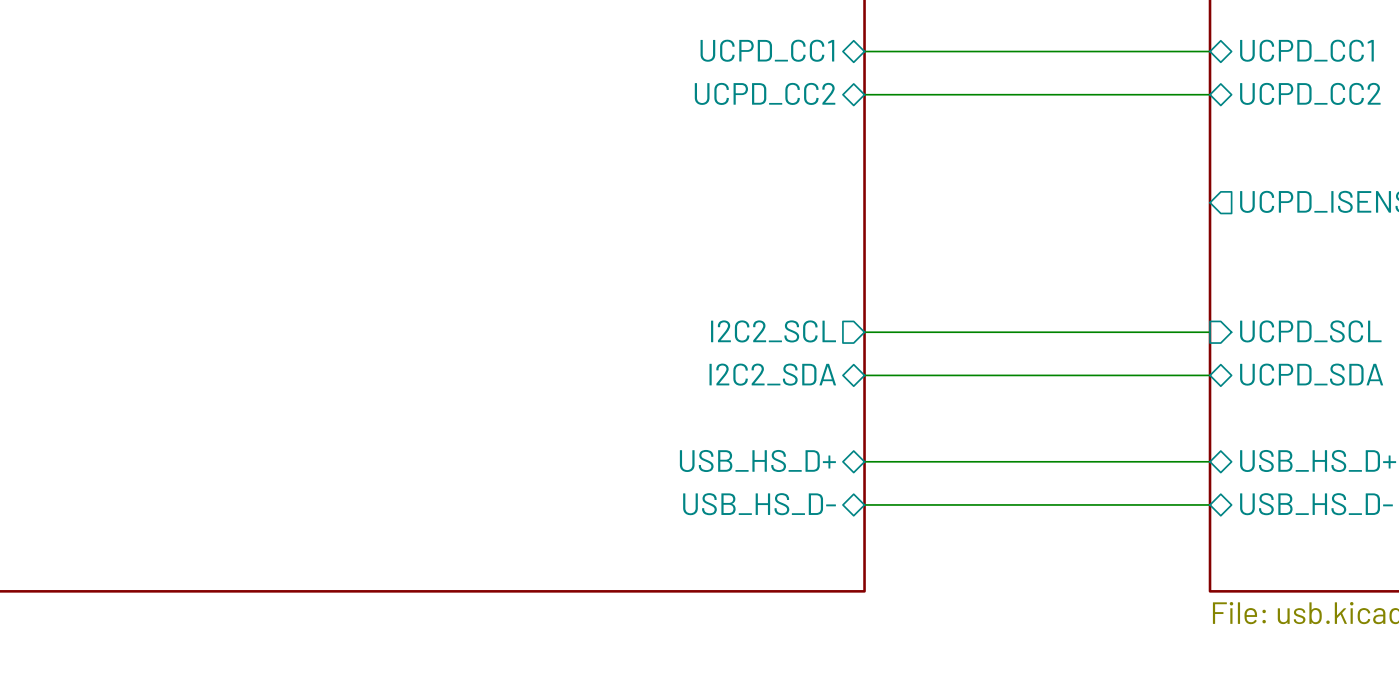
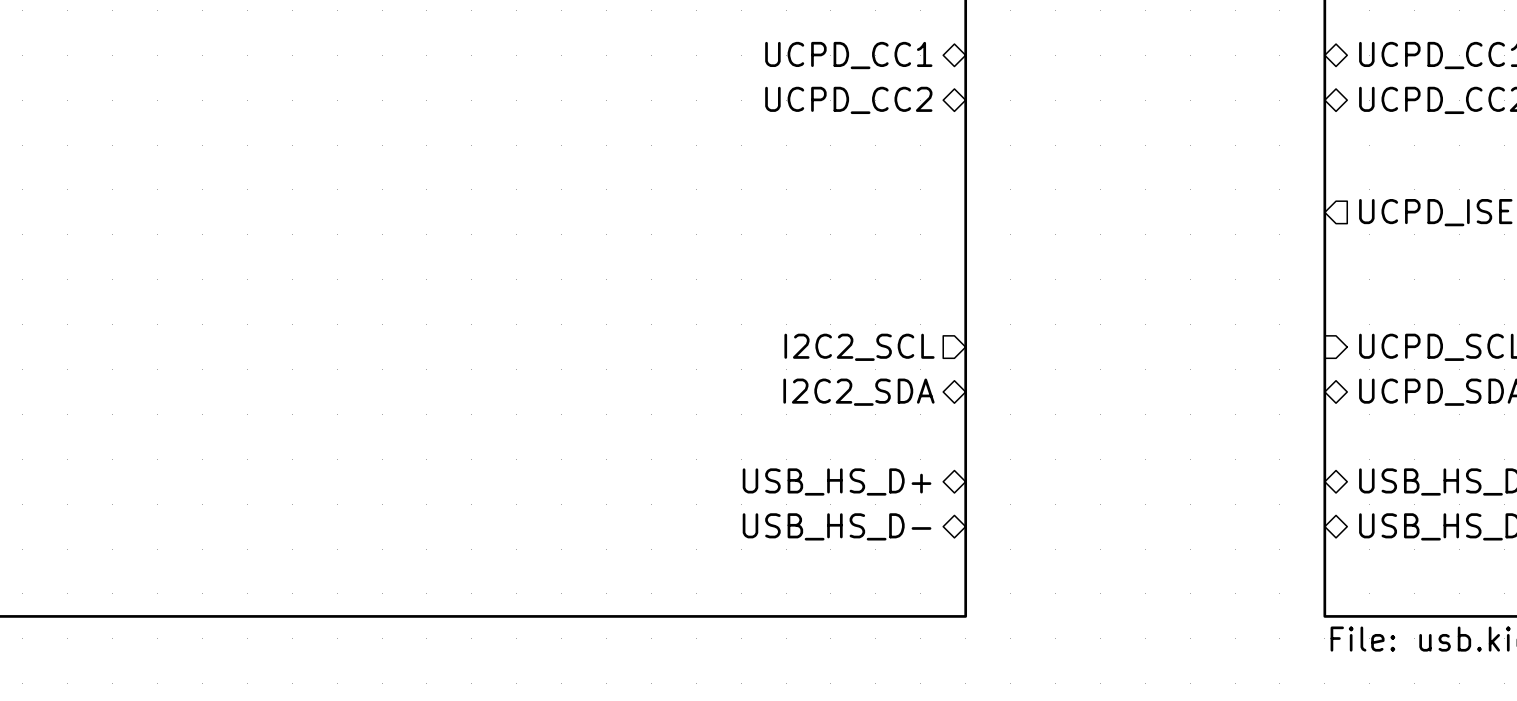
wire: (864, 51) (1210, 51) -> none
wire: (864, 94) (1210, 94) -> none
wire: (864, 332) (1210, 332) -> none
wire: (864, 375) (1210, 375) -> none
wire: (864, 461) (1210, 461) -> none
wire: (864, 504) (1210, 504) -> none

